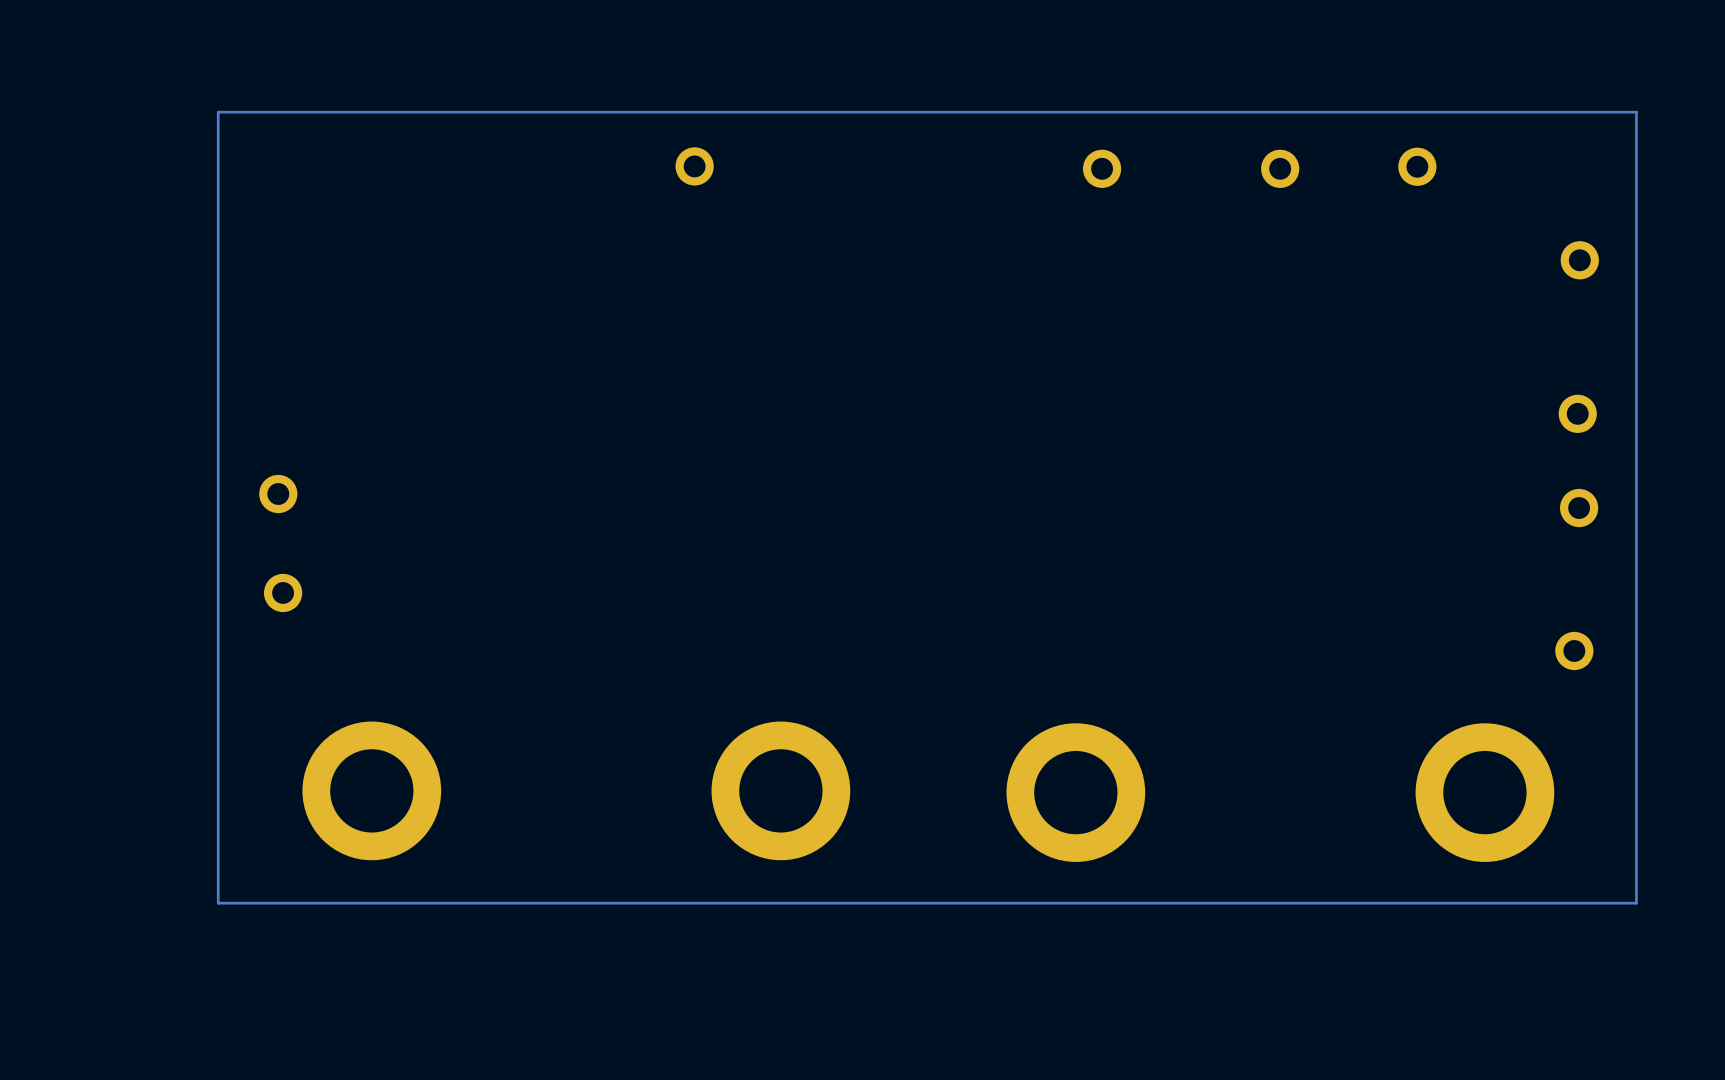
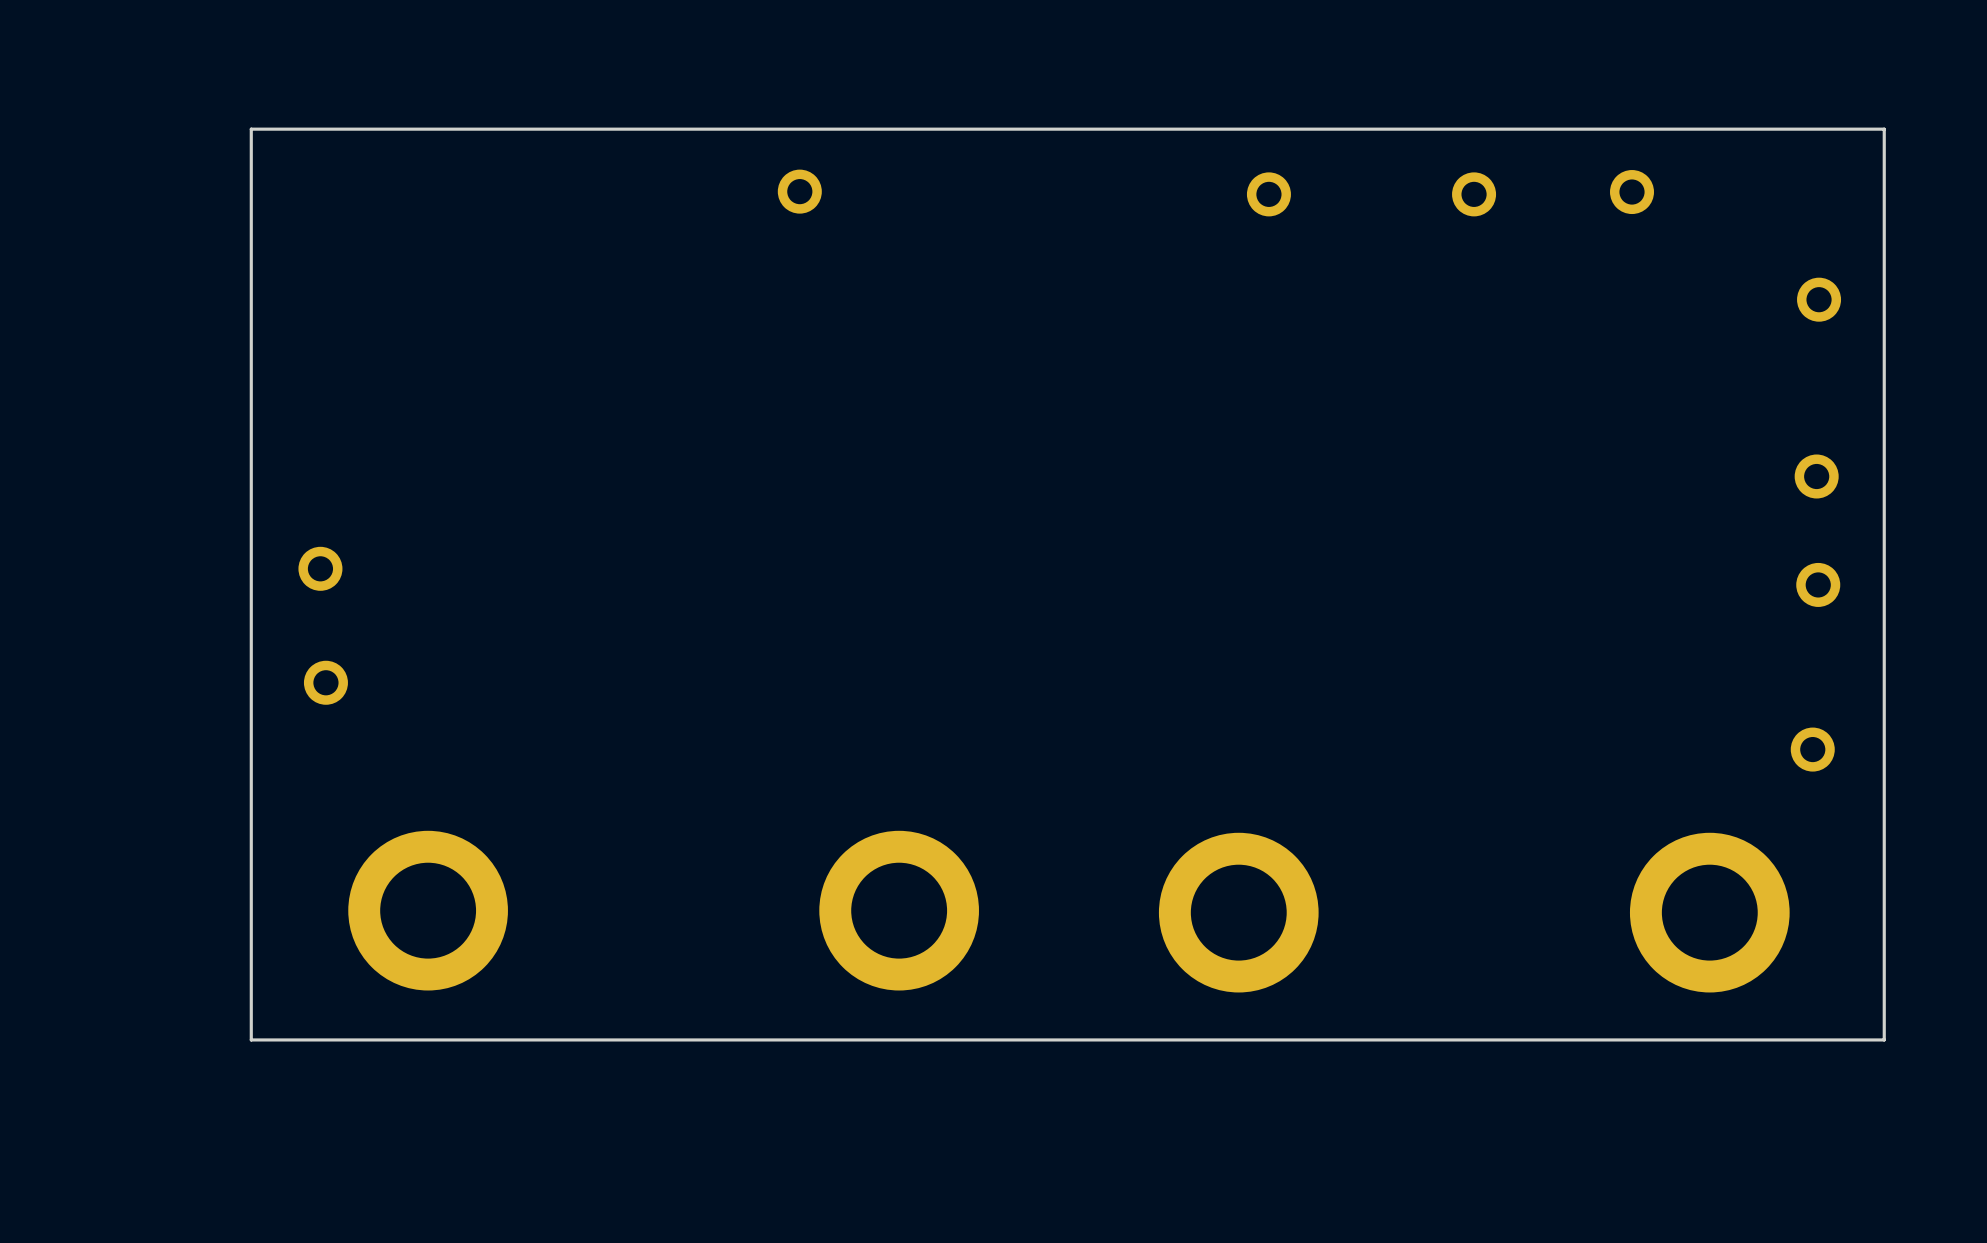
track: (1636, 112) (218, 112) (218, 903) (1636, 903) (1636, 112) -> none
board edge: none -> (1884, 129) (251, 129) (251, 1039) (1884, 1039) (1884, 129)

